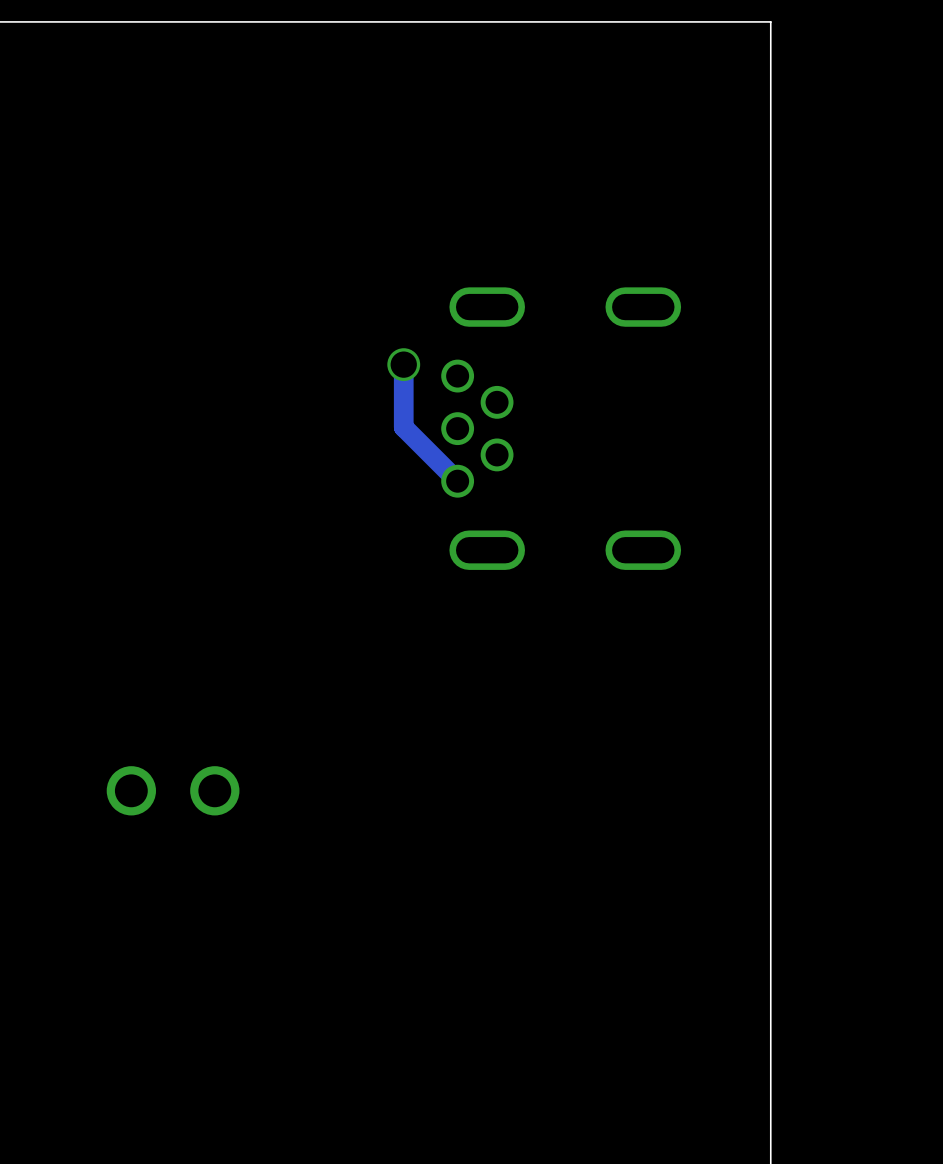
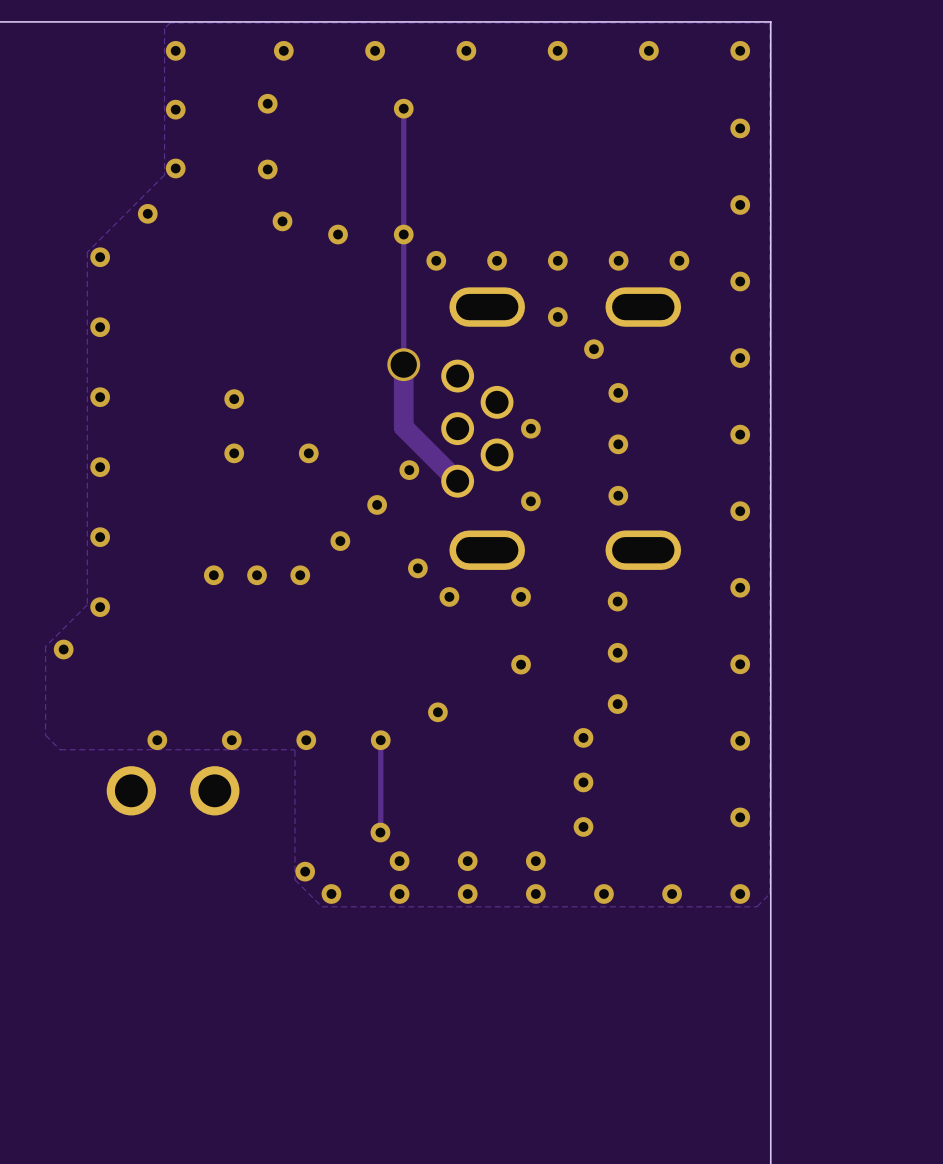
zone outline: none -> (769, 22) (170, 22) (164, 28) (164, 175) (87, 252) (87, 604) (45, 646) (45, 735) (60, 749) (294, 749) (294, 879) (321, 906) (756, 906) (769, 893) (769, 22)
via: none -> (175, 50)
via: none -> (283, 50)
via: none -> (375, 50)
via: none -> (466, 50)
via: none -> (557, 50)
via: none -> (648, 50)
via: none -> (740, 50)
via: none -> (267, 103)
track: none -> (403, 108) (403, 364)
via: none -> (403, 108)
via: none -> (175, 109)
via: none -> (740, 128)
via: none -> (175, 168)
via: none -> (267, 169)
via: none -> (740, 204)
via: none -> (147, 213)
via: none -> (282, 221)
via: none -> (338, 234)
via: none -> (403, 234)
via: none -> (100, 257)
via: none -> (436, 260)
via: none -> (497, 260)
via: none -> (557, 260)
via: none -> (618, 260)
via: none -> (679, 260)
via: none -> (740, 281)
via: none -> (557, 317)
via: none -> (100, 327)
via: none -> (593, 349)
via: none -> (740, 358)
via: none -> (618, 392)
via: none -> (100, 397)
via: none -> (234, 399)
via: none -> (530, 428)
via: none -> (740, 434)
via: none -> (618, 444)
via: none -> (234, 453)
via: none -> (308, 453)
via: none -> (100, 467)
via: none -> (409, 470)
via: none -> (618, 495)
via: none -> (530, 501)
via: none -> (377, 504)
via: none -> (740, 511)
via: none -> (100, 537)
via: none -> (340, 541)
via: none -> (417, 568)
via: none -> (213, 575)
via: none -> (257, 575)
via: none -> (300, 575)
via: none -> (740, 587)
via: none -> (449, 596)
via: none -> (521, 596)
via: none -> (617, 601)
via: none -> (100, 607)
via: none -> (63, 649)
via: none -> (617, 652)
via: none -> (521, 664)
via: none -> (740, 664)
via: none -> (617, 704)
via: none -> (437, 712)
via: none -> (583, 737)
via: none -> (157, 740)
via: none -> (231, 740)
via: none -> (306, 740)
track: none -> (380, 740) (380, 826)
via: none -> (380, 740)
via: none -> (740, 740)
via: none -> (583, 782)
via: none -> (740, 817)
via: none -> (583, 826)
via: none -> (380, 832)
via: none -> (399, 861)
via: none -> (467, 861)
via: none -> (535, 861)
via: none -> (305, 871)
via: none -> (331, 893)
via: none -> (399, 893)
via: none -> (467, 893)
via: none -> (535, 893)
via: none -> (603, 893)
via: none -> (672, 893)
via: none -> (740, 893)

